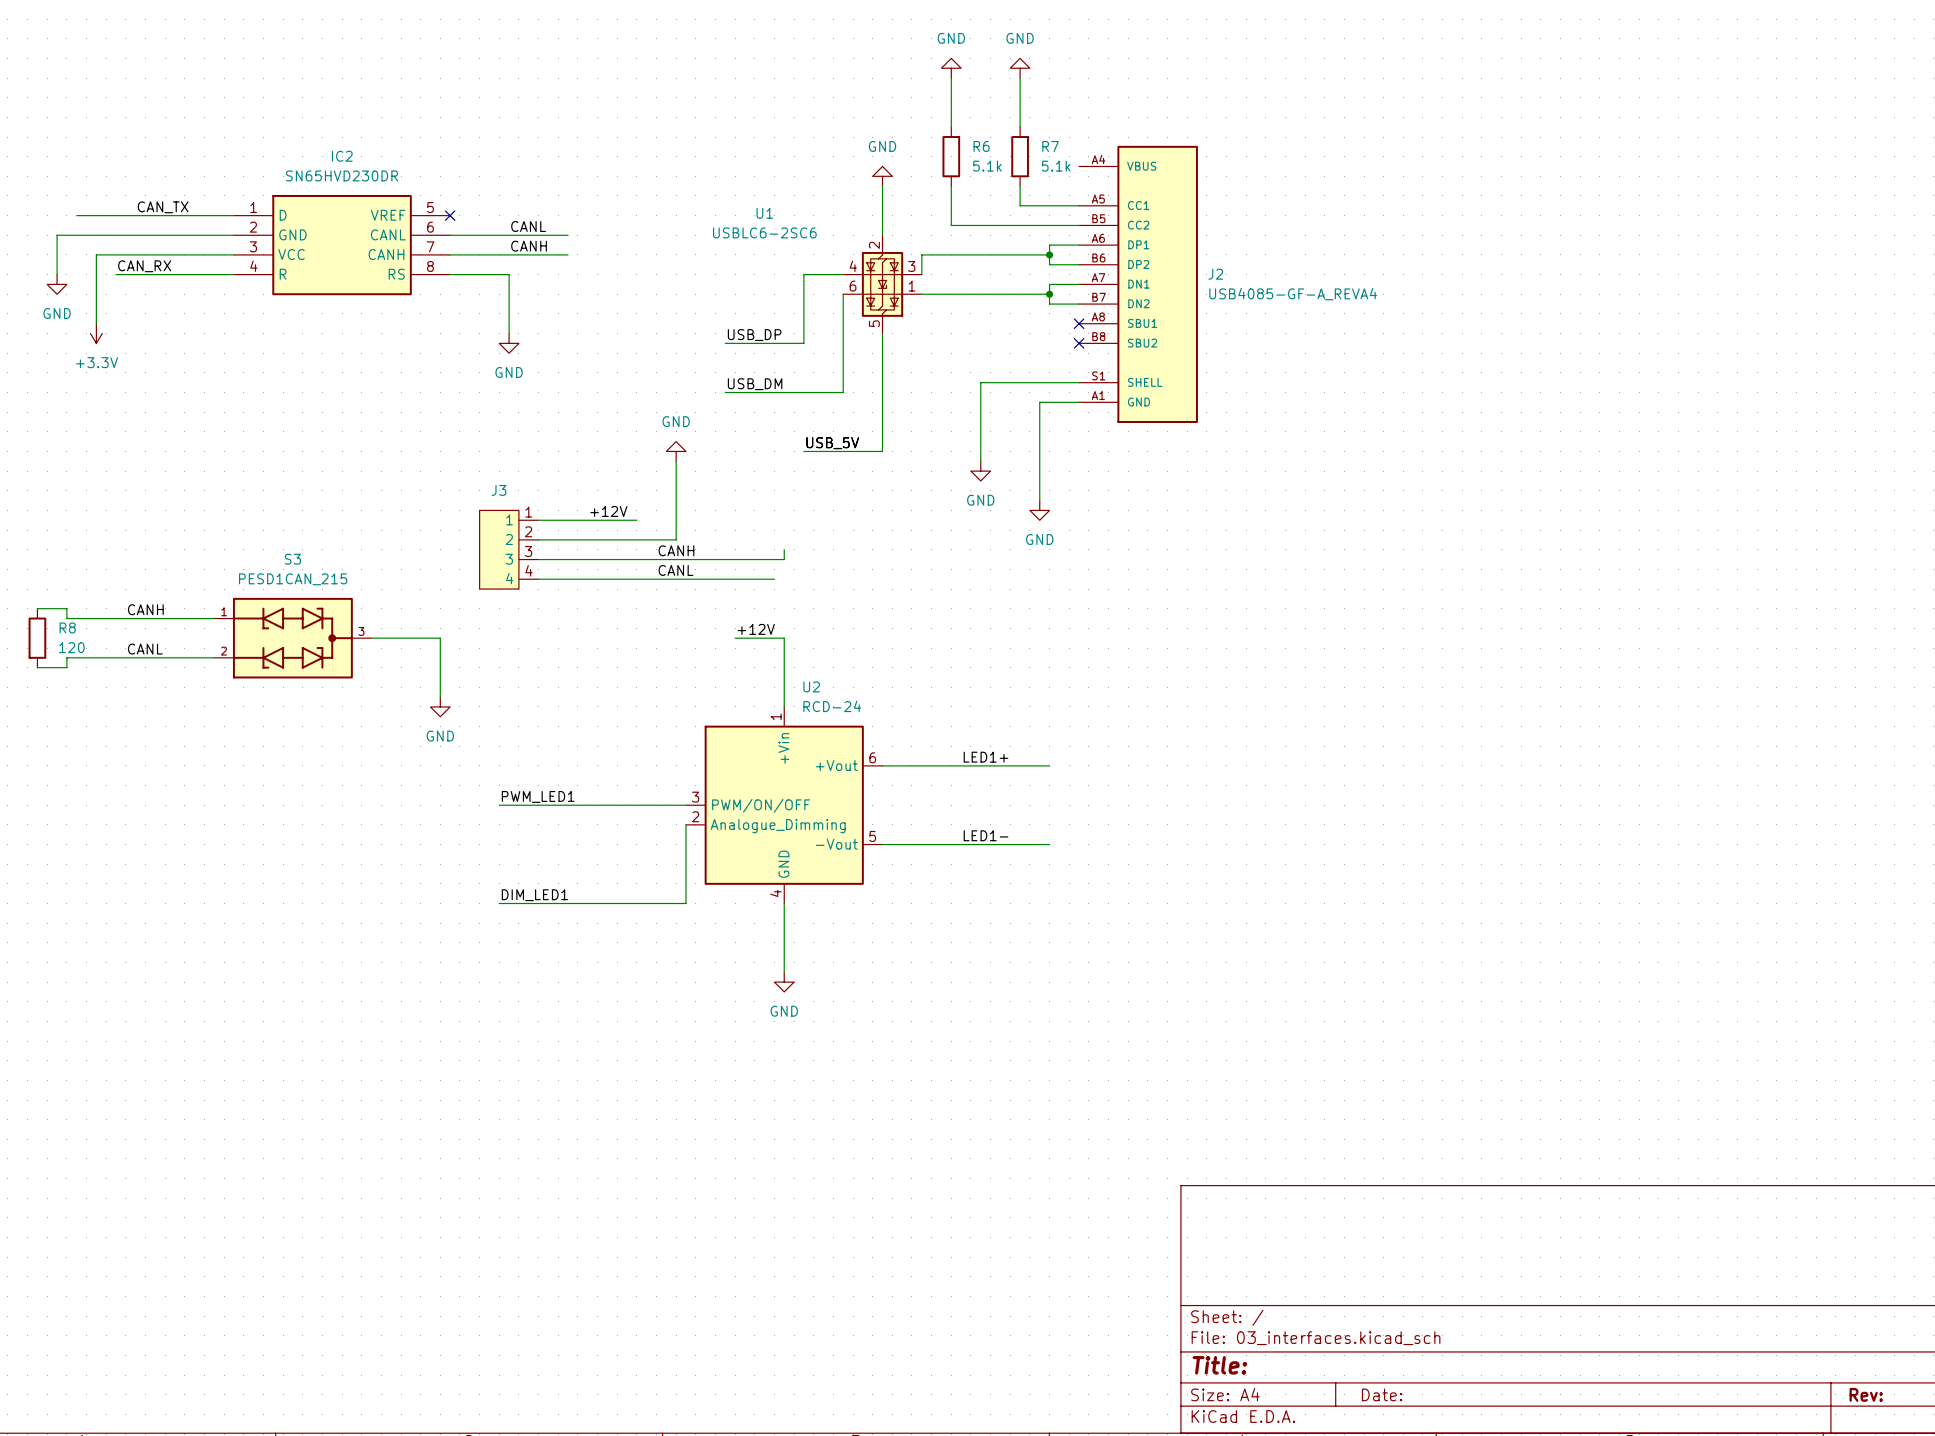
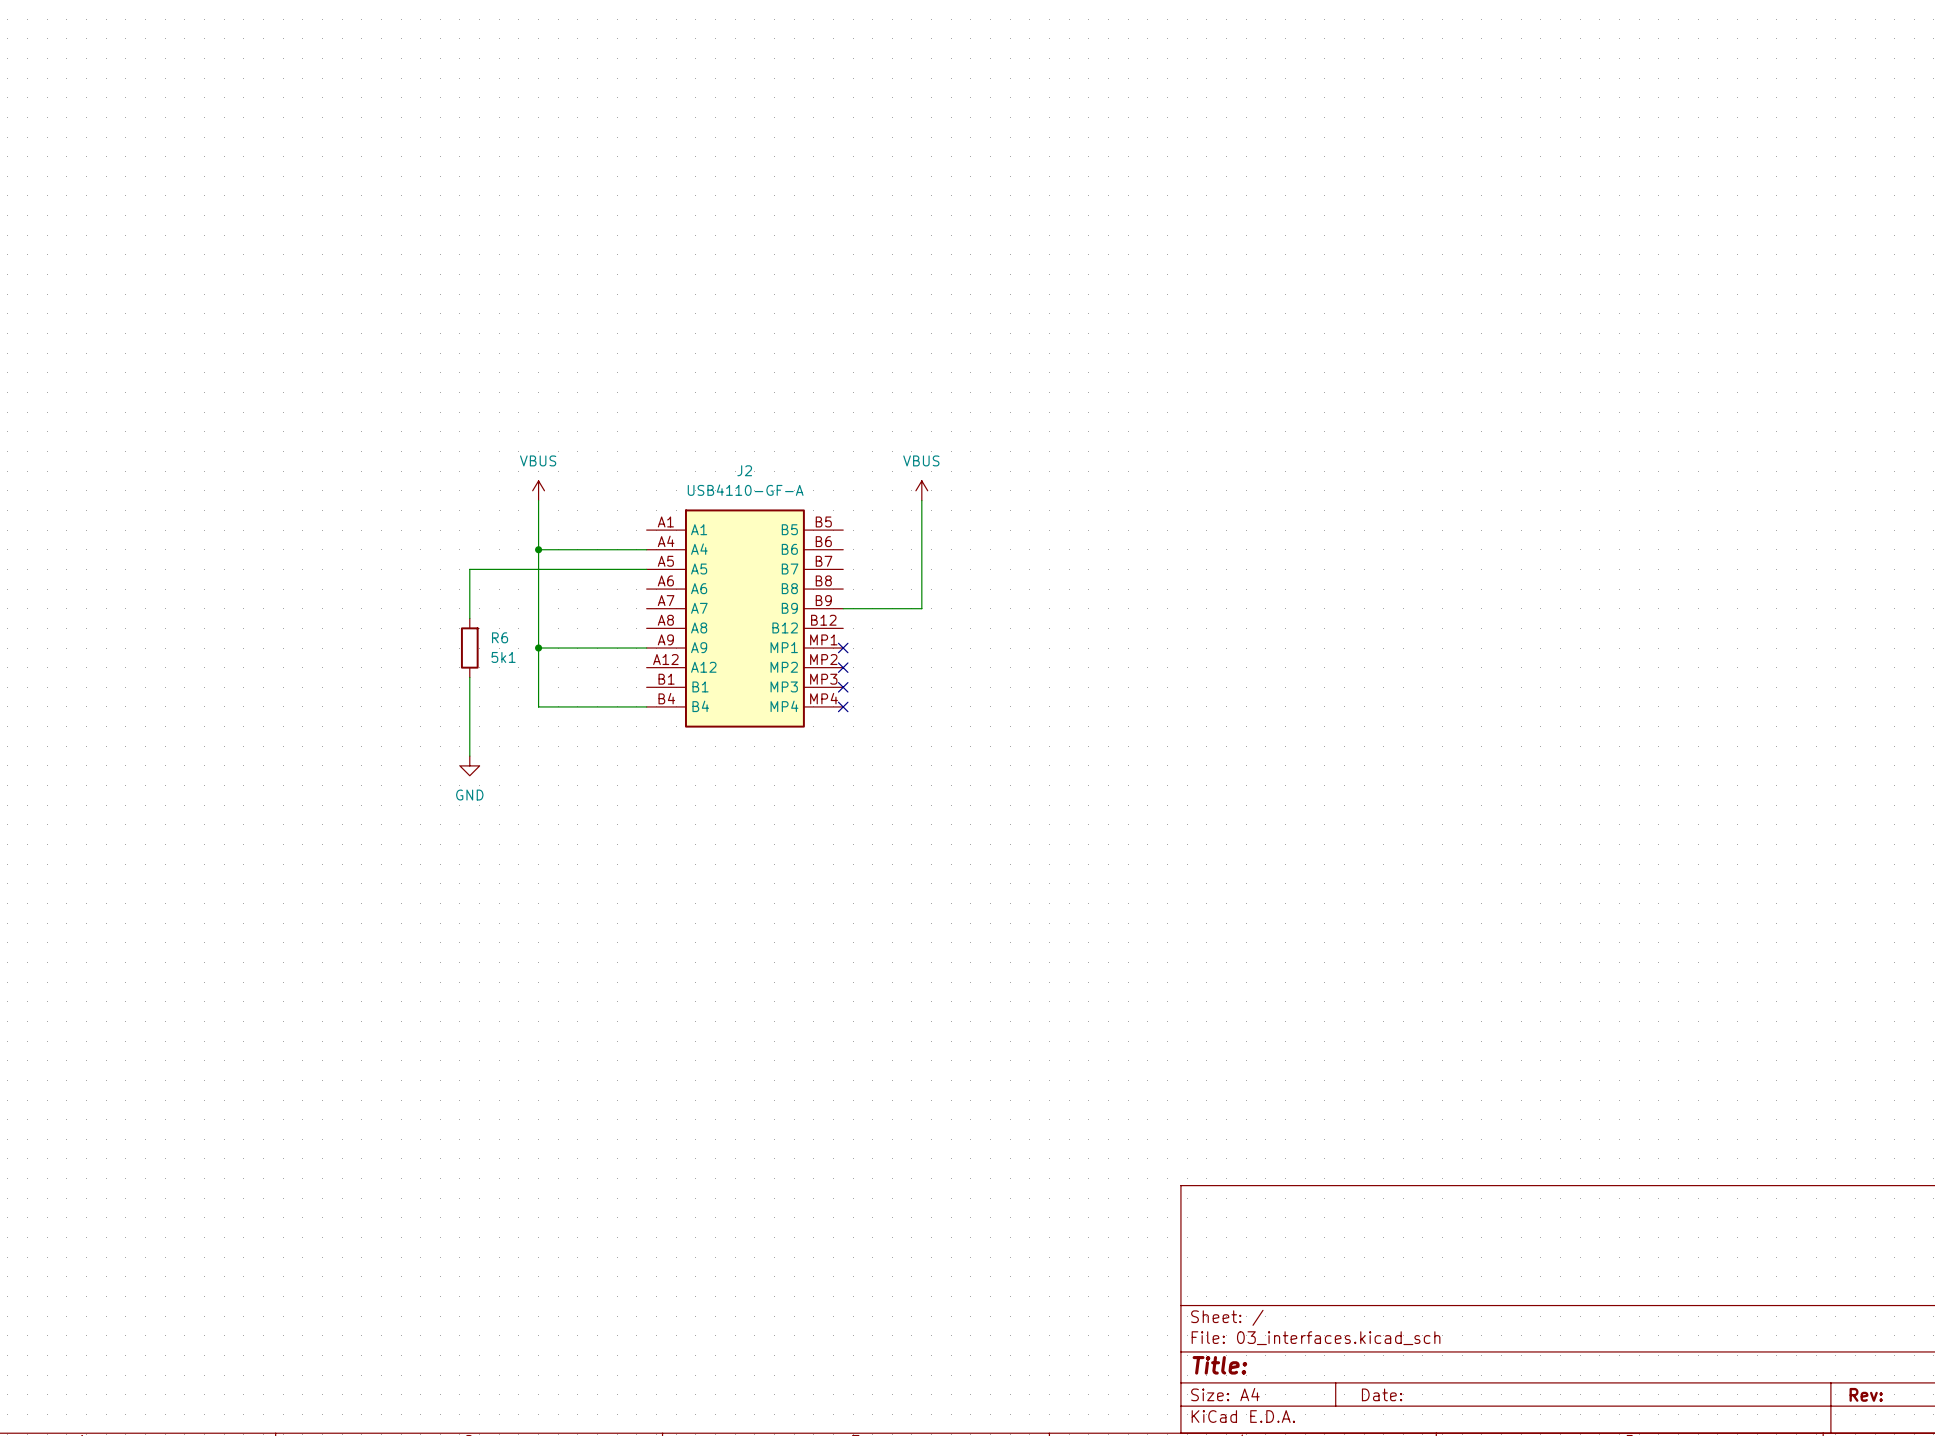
power symbol: GND (951, 68) -> none
power symbol: GND (1020, 68) -> none
wire: (951, 78) (951, 127) -> none
wire: (1020, 78) (1020, 127) -> none
J2 symbol: [1079, 145, 1198, 423] -> [646, 509, 844, 728]
R6 position: (951, 156) -> (469, 648)
R7: 5.1k (1020, 156) -> none
R6 value: 5.1k (987, 166) -> 5k1 (503, 657)
power symbol: GND (882, 176) -> none
wire: (882, 186) (882, 235) -> none
wire: (951, 186) (951, 225) (1079, 225) -> none
wire: (1020, 186) (1020, 205) (1079, 205) -> none
label: CAN_TX (163, 207) -> none
wire: (76, 215) (233, 215) -> none
no-connect mark: (450, 215) -> none
label: CANL (528, 226) -> none
wire: (233, 235) (57, 235) (57, 274) -> none
wire: (450, 235) (568, 235) -> none
IC2: SN65HVD230DR (342, 245) -> none
wire: (1079, 245) (1049, 245) (1049, 264) (1079, 264) -> none
label: CANH (529, 246) -> none
wire: (233, 254) (96, 254) (96, 323) -> none
wire: (450, 254) (568, 254) -> none
wire: (1049, 254) (921, 254) (921, 274) -> none
junction: (1049, 254) -> none
label: CAN_RX (144, 266) -> none
wire: (116, 274) (233, 274) -> none
wire: (450, 274) (509, 274) (509, 333) -> none
wire: (843, 274) (803, 274) (803, 343) (725, 343) -> none
J2 name position: J2 (1215, 274) -> J2 (744, 470)
power symbol: GND (57, 284) -> none
U1: USBLC6-2SC6 (882, 284) -> none
wire: (1079, 284) (1049, 284) (1049, 304) (1079, 304) -> none
wire: (843, 294) (843, 392) (725, 392) -> none
wire: (921, 294) (1049, 294) -> none
junction: (1049, 294) -> none
J2 value: USB4085-GF-A_REVA4 (1293, 294) -> USB4110-GF-A (745, 490)
no-connect mark: (1079, 323) -> none
power symbol: +3.3V (96, 333) -> none
wire: (882, 333) (882, 451) (803, 451) -> none
label: USB_DP (754, 335) -> none
power symbol: GND (509, 343) -> none
no-connect mark: (1079, 343) -> none
wire: (1079, 382) (980, 382) (980, 461) -> none
label: USB_DM (755, 384) -> none
wire: (1079, 402) (1039, 402) (1039, 500) -> none
label: USB_5V (832, 443) -> none
power symbol: GND (676, 451) -> none
wire: (676, 461) (676, 539) (538, 539) -> none
power symbol: GND (980, 471) -> none
power symbol: none -> VBUS (538, 490)
power symbol: none -> VBUS (921, 490)
wire: none -> (538, 500) (538, 706) (646, 706)
wire: none -> (921, 500) (921, 608) (843, 608)
power symbol: GND (1039, 510) -> none
label: +12V (608, 511) -> none
wire: (538, 520) (636, 520) -> none
J3: (509, 549) -> none
wire: none -> (538, 549) (646, 549)
junction: none -> (538, 549)
wire: (784, 549) (784, 559) (538, 559) -> none
label: CANH (676, 550) -> none
wire: none -> (646, 569) (469, 569) (469, 618)
label: CANL (675, 570) -> none
wire: (538, 579) (774, 579) -> none
wire: (37, 608) (66, 608) (66, 618) (214, 618) -> none
label: CANH (145, 609) -> none
label: +12V (756, 629) -> none
R8: 120 (37, 638) -> none
S3: PESD1CAN_215 (292, 638) -> none
wire: (371, 638) (440, 638) (440, 697) -> none
wire: none -> (538, 648) (646, 648)
junction: none -> (538, 648)
no-connect mark: none -> (843, 648)
label: CANL (145, 649) -> none
wire: (214, 657) (66, 657) (66, 667) (37, 667) -> none
no-connect mark: none -> (843, 667)
wire: none -> (469, 677) (469, 756)
no-connect mark: none -> (843, 687)
power symbol position: GND (440, 706) -> GND (469, 765)
no-connect mark: none -> (843, 706)
label: LED1+ (986, 757) -> none
wire: (882, 765) (1049, 765) -> none
label: PWM_LED1 (538, 796) -> none
wire: (499, 805) (685, 805) -> none
U2: RCD-24 (784, 805) -> none
wire: (685, 824) (685, 903) (499, 903) -> none
label: LED1- (986, 835) -> none
wire: (882, 844) (1049, 844) -> none
label: DIM_LED1 (534, 895) -> none
wire: (784, 903) (784, 972) -> none
power symbol: GND (784, 982) -> none

